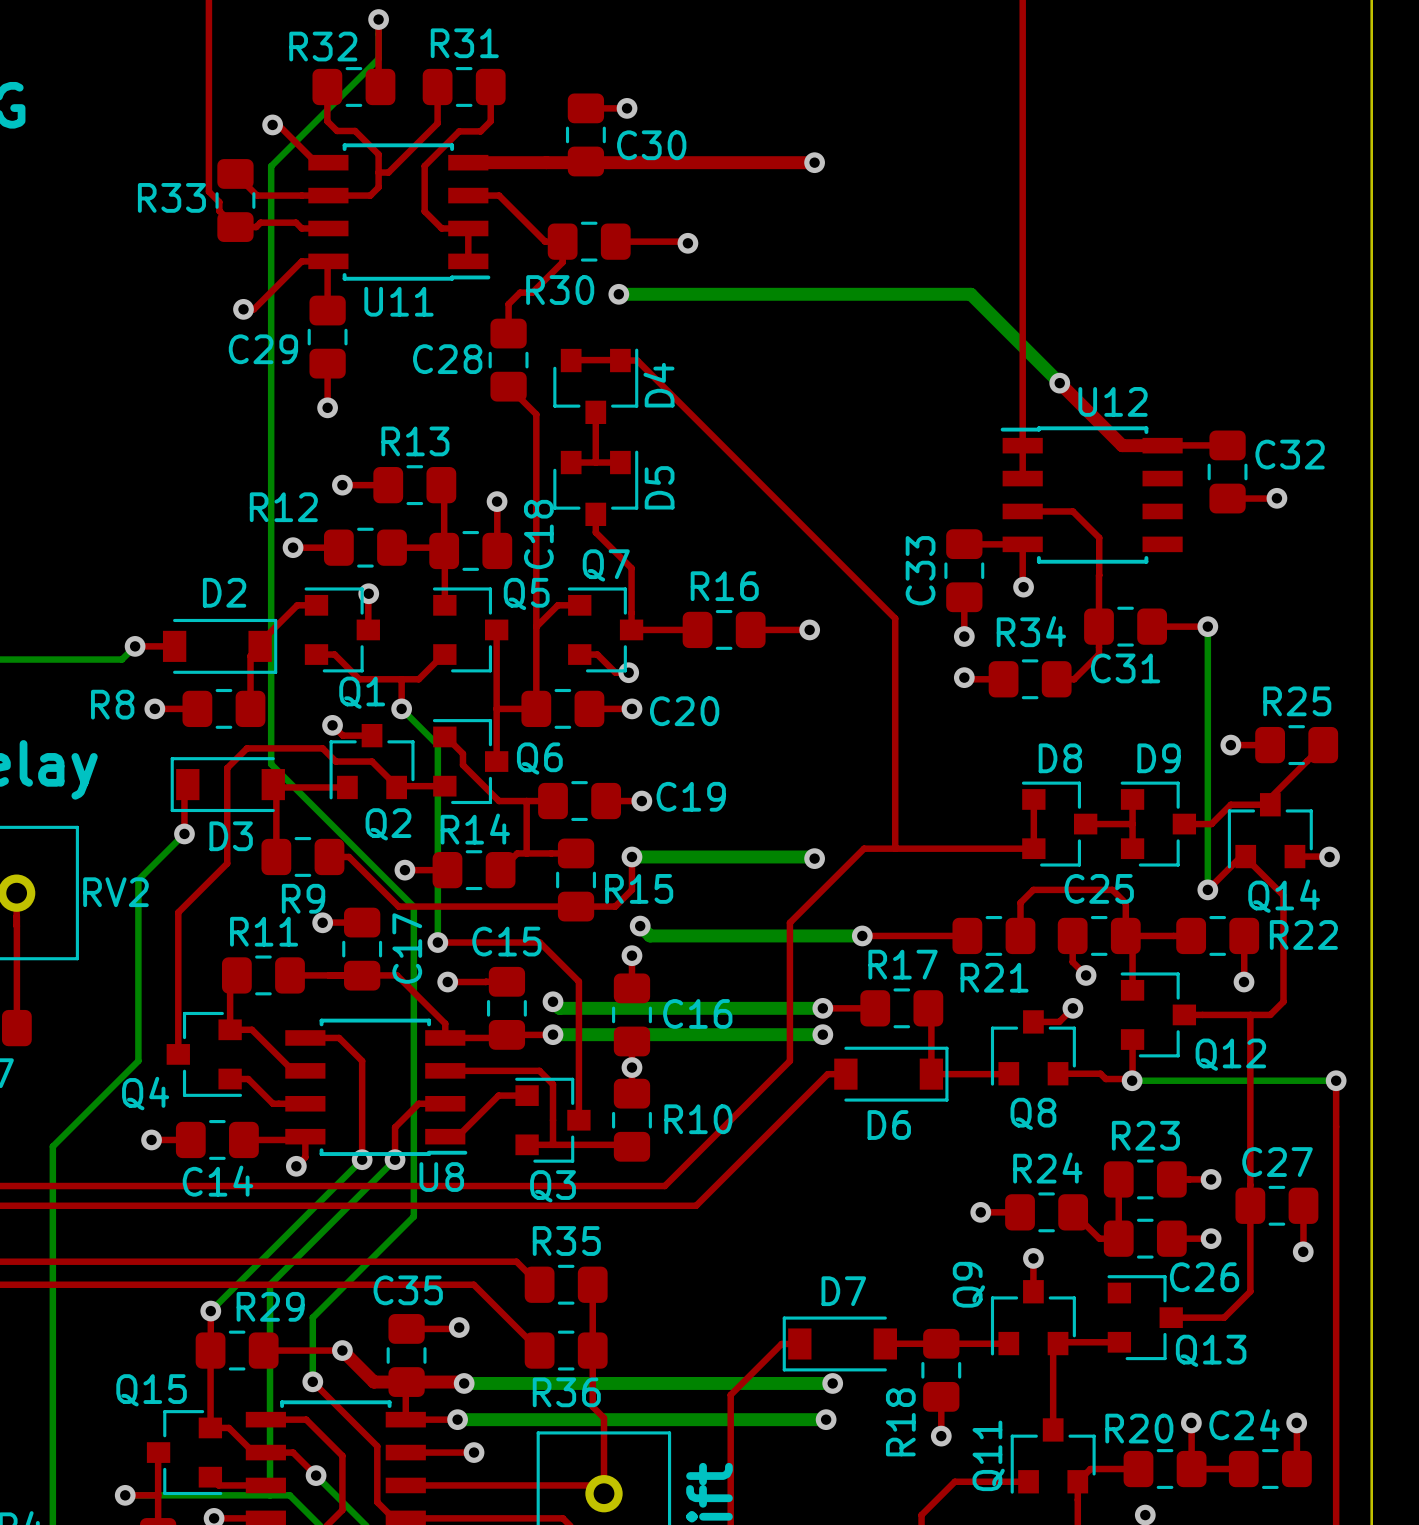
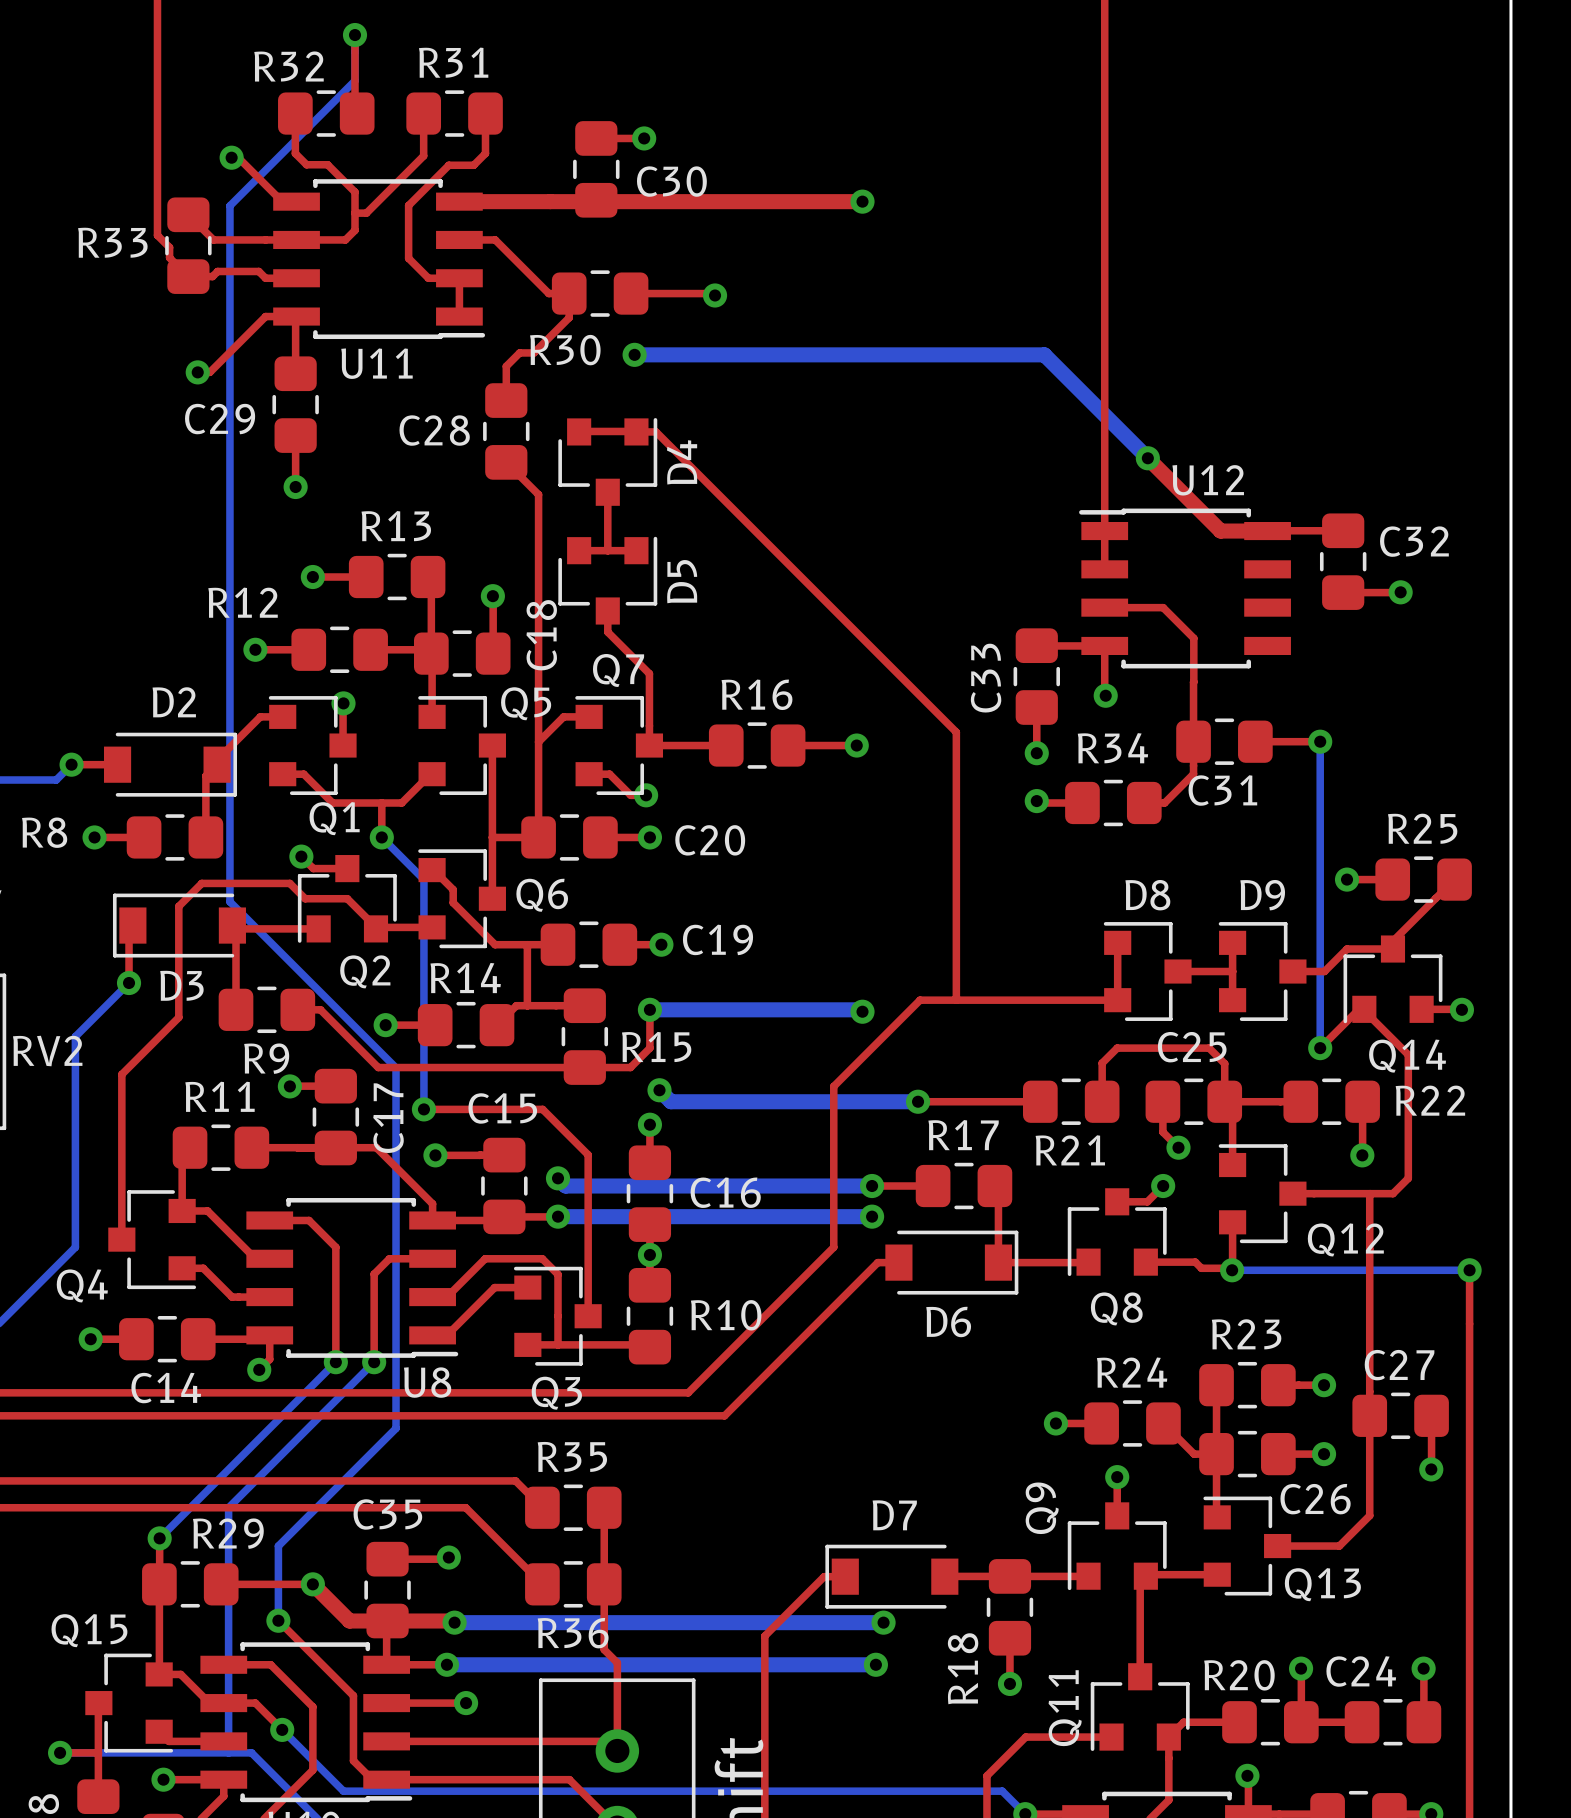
top track: (445, 1070) (490, 1070) -> (432, 1297) (446, 1297) (485, 1258)
top track: (445, 1103) (418, 1103) (395, 1127) -> (419, 1258) (389, 1258) (374, 1274) (374, 1324)
top track: none -> (1216, 1454) (1217, 1517)

